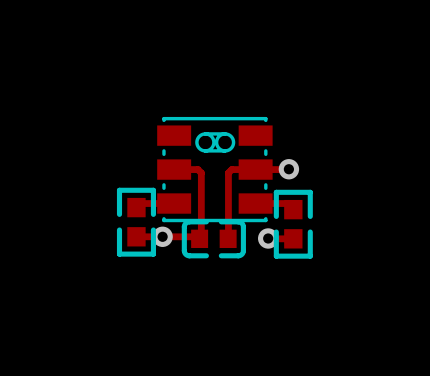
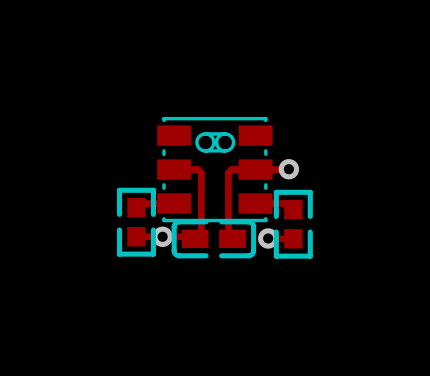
part footprint: [181, 219, 246, 259] -> [171, 219, 257, 259]

